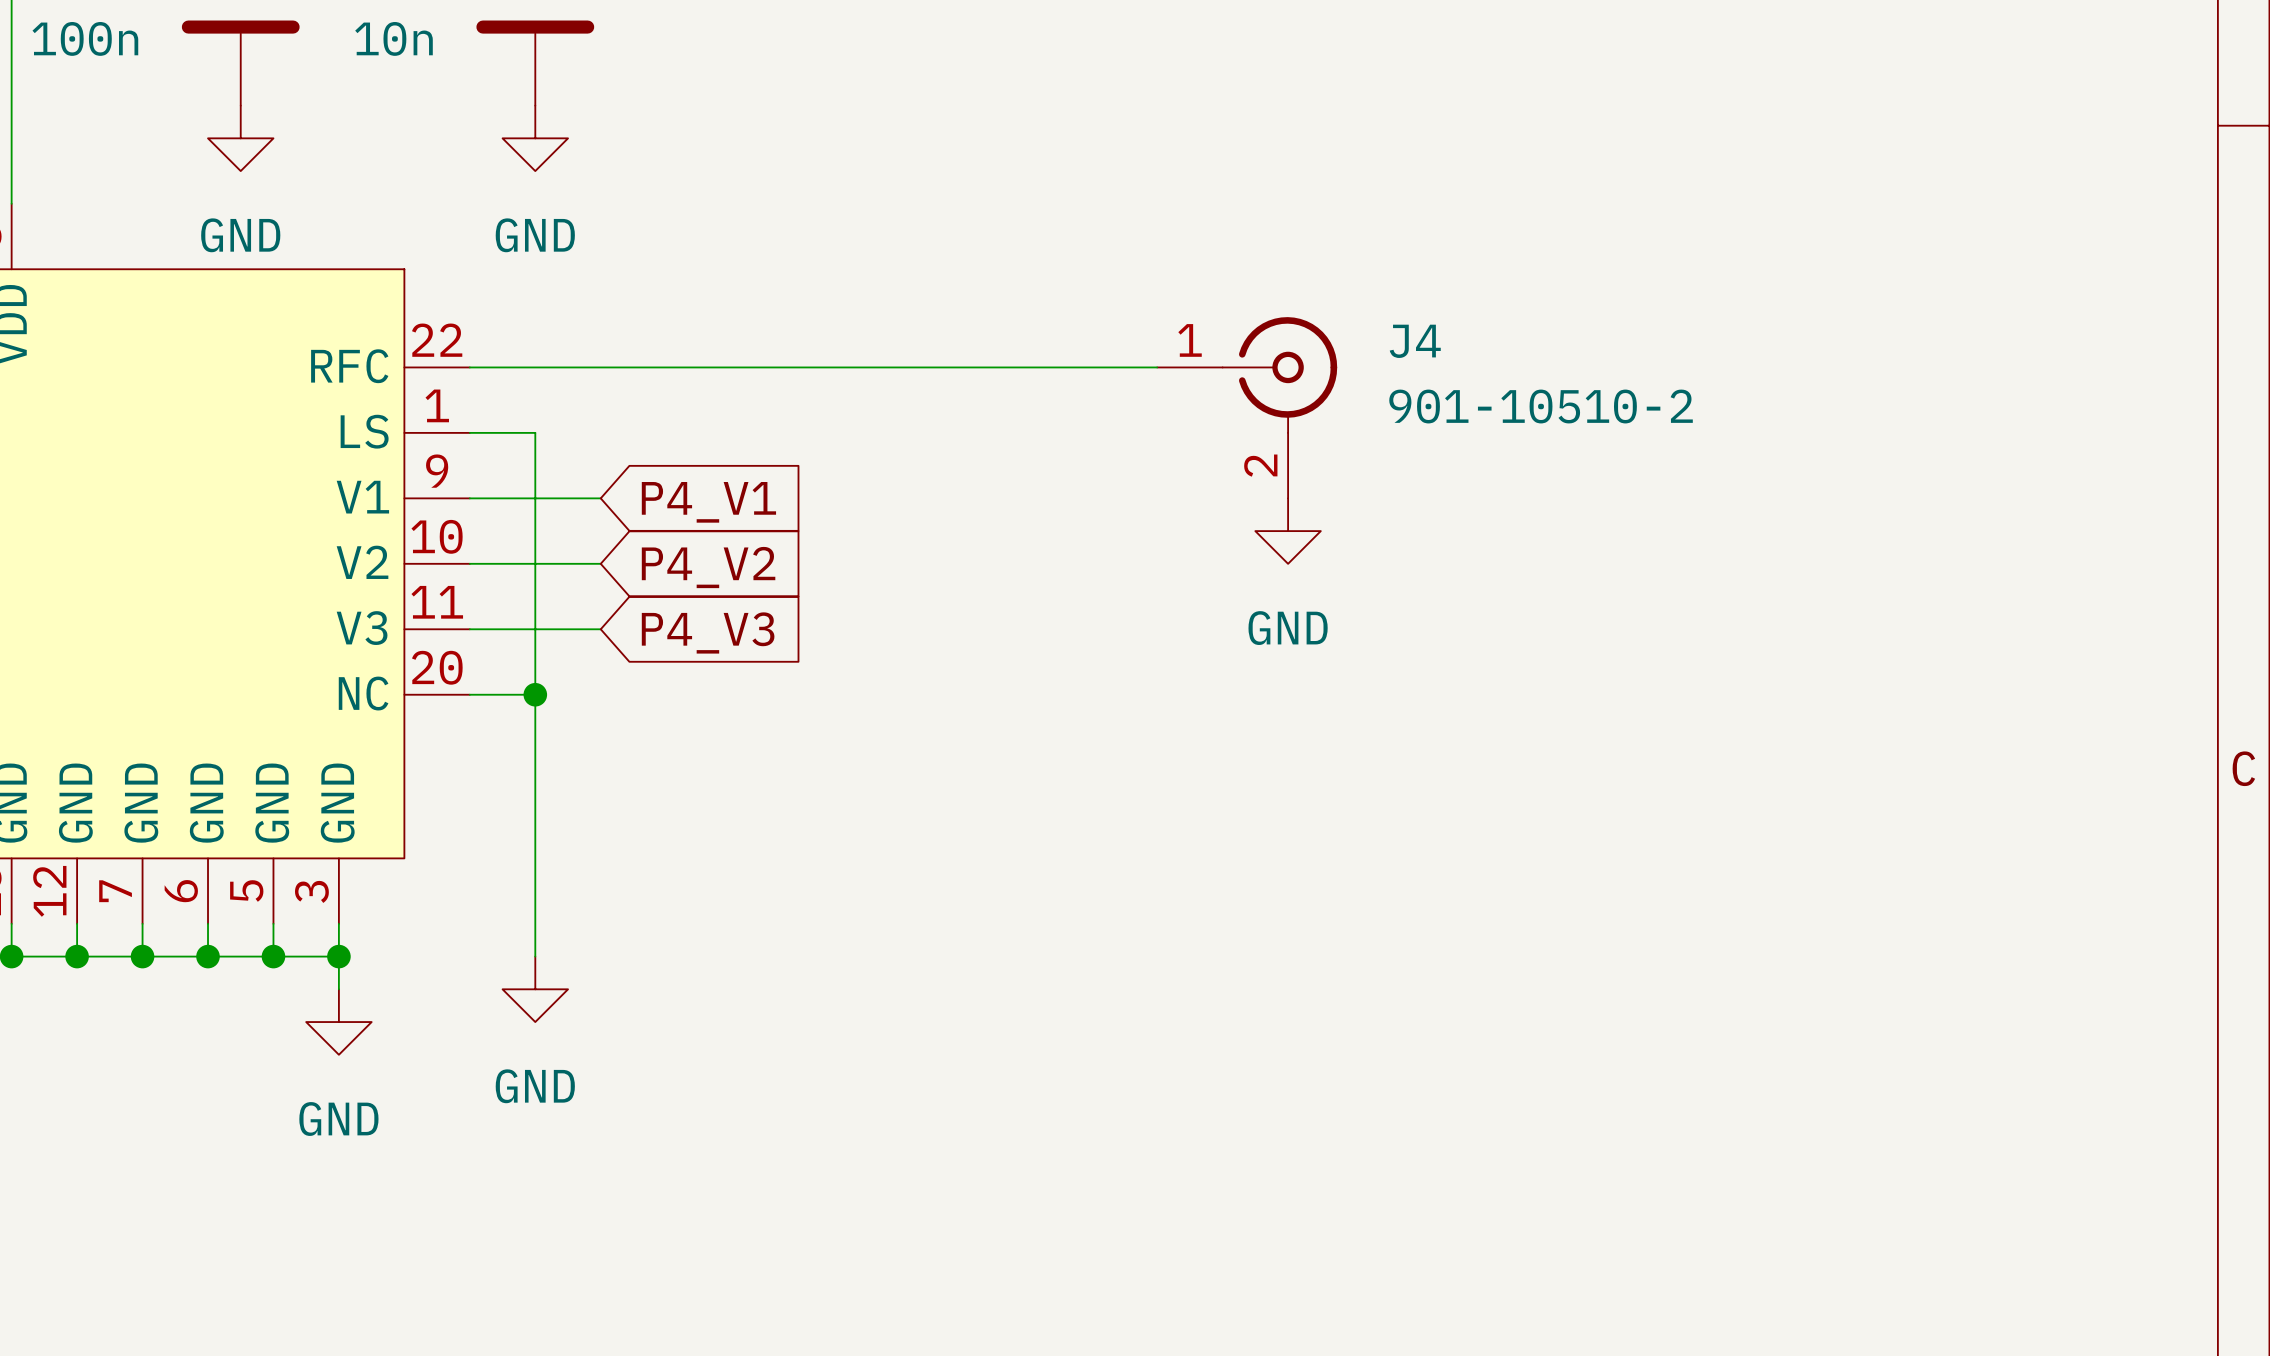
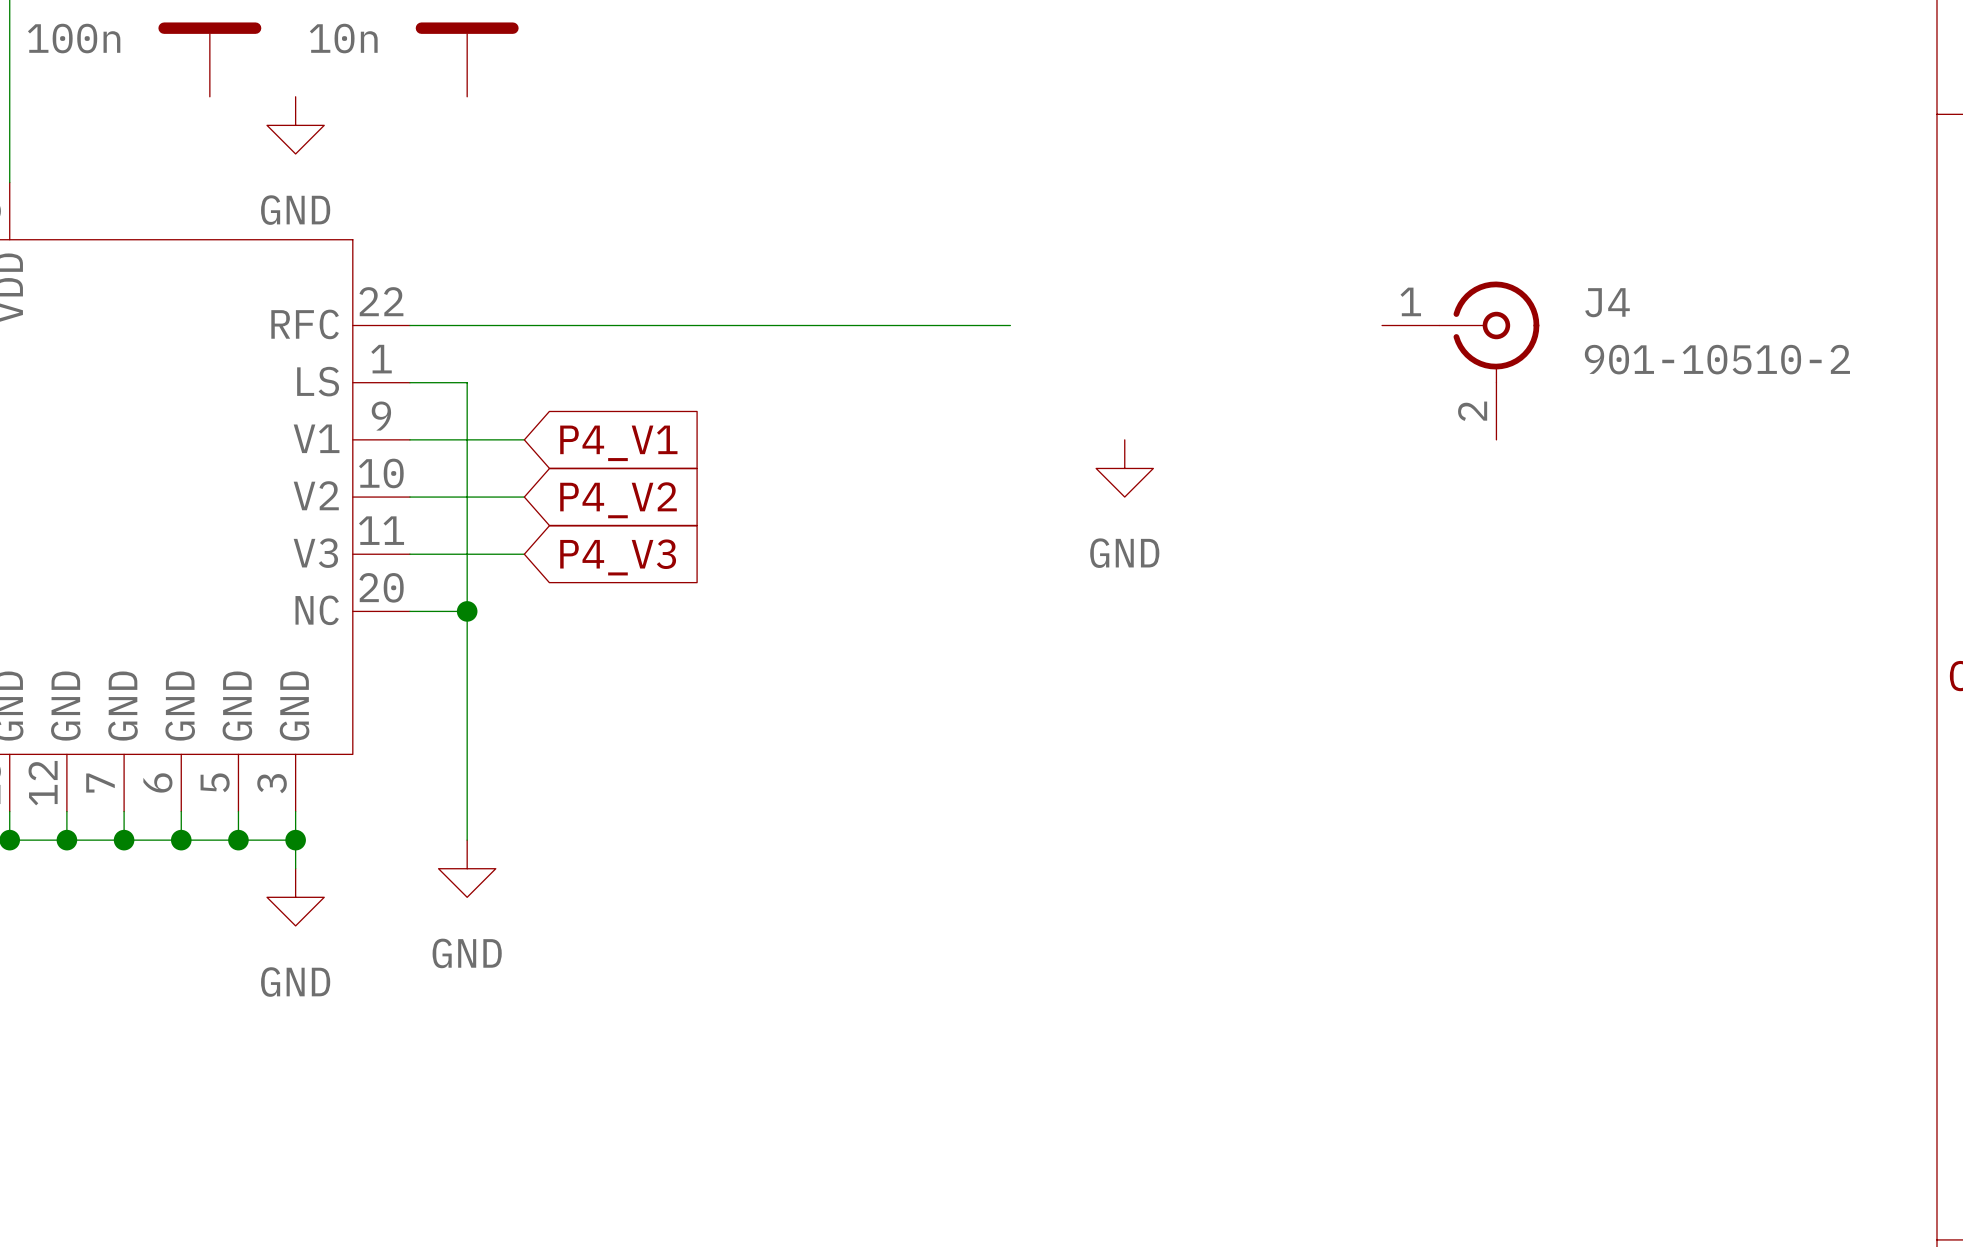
power symbol: GND (240, 138) -> none
power symbol: none -> GND (295, 125)
power symbol: GND (535, 138) -> none
J4 position: (1247, 407) -> (1460, 360)

